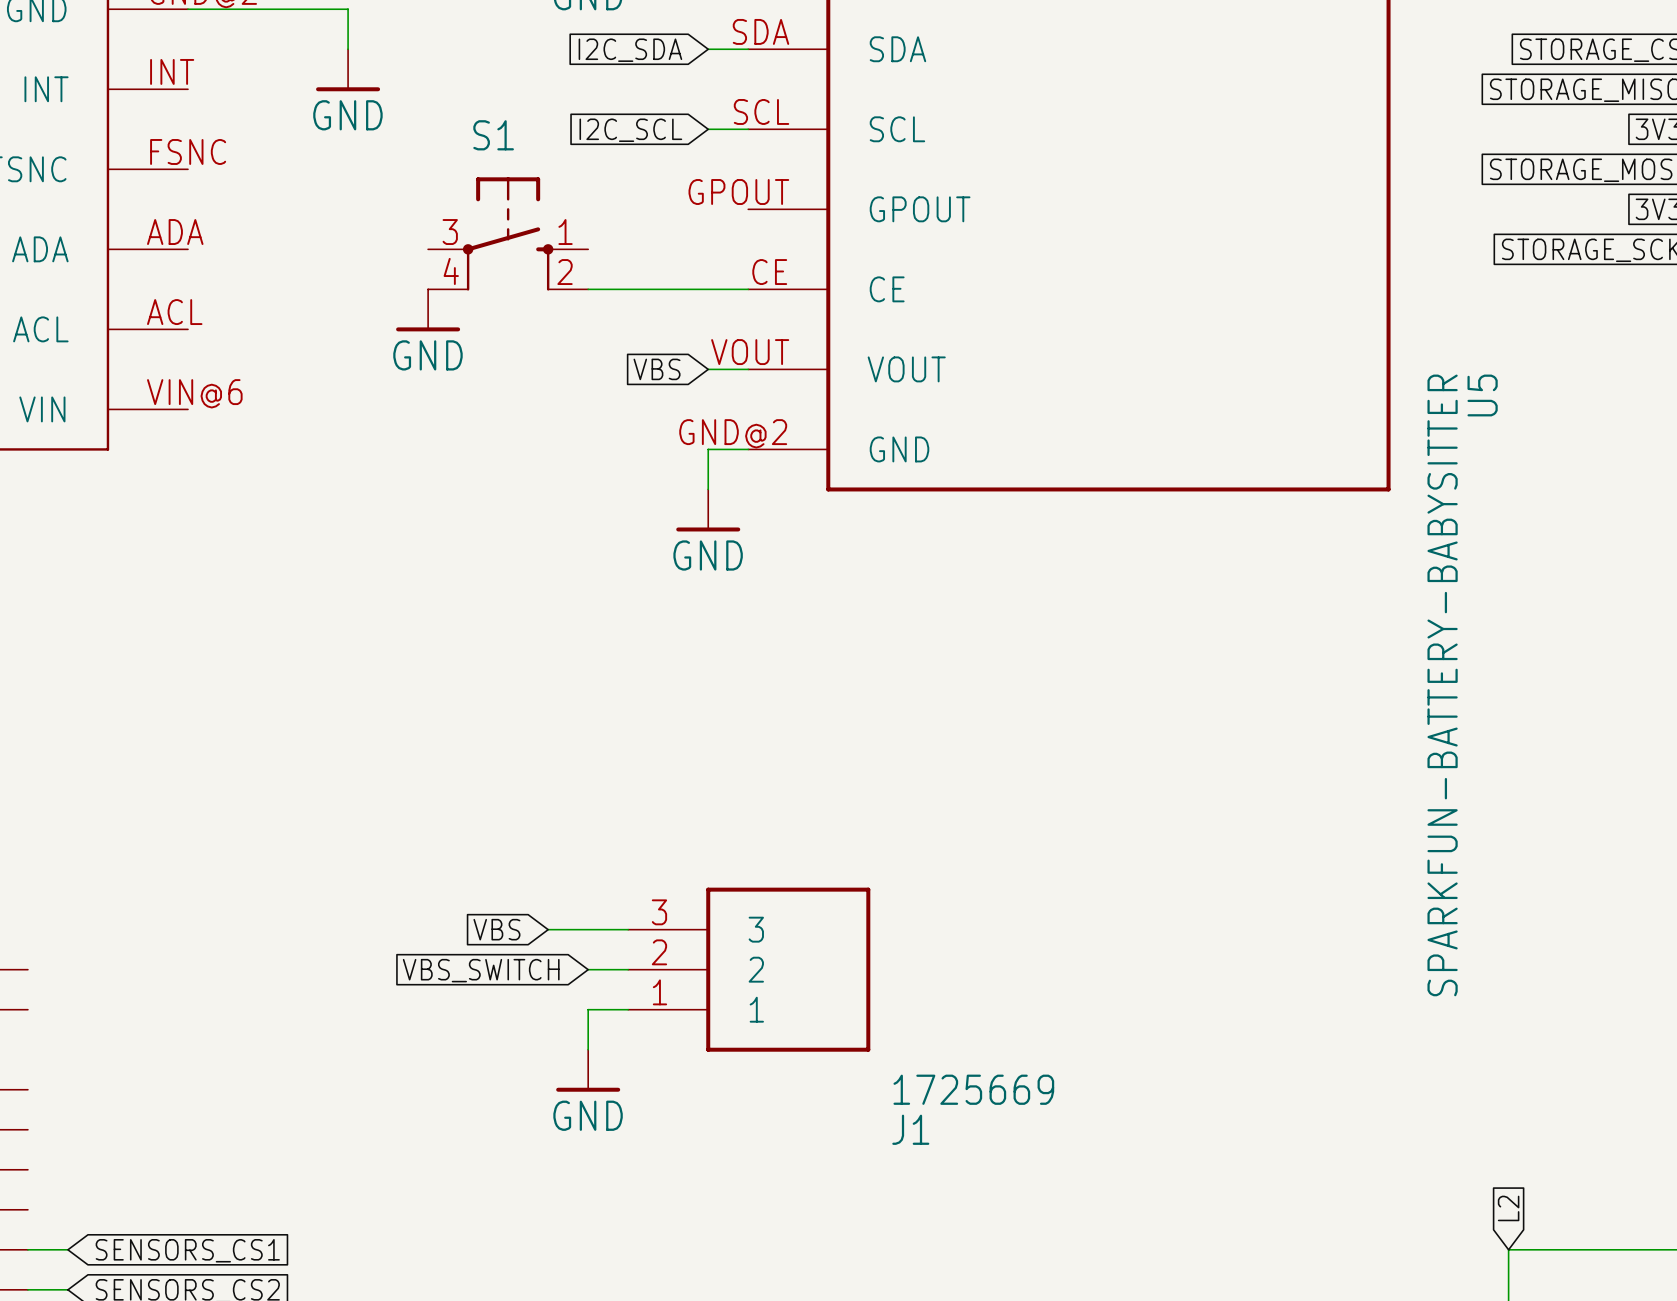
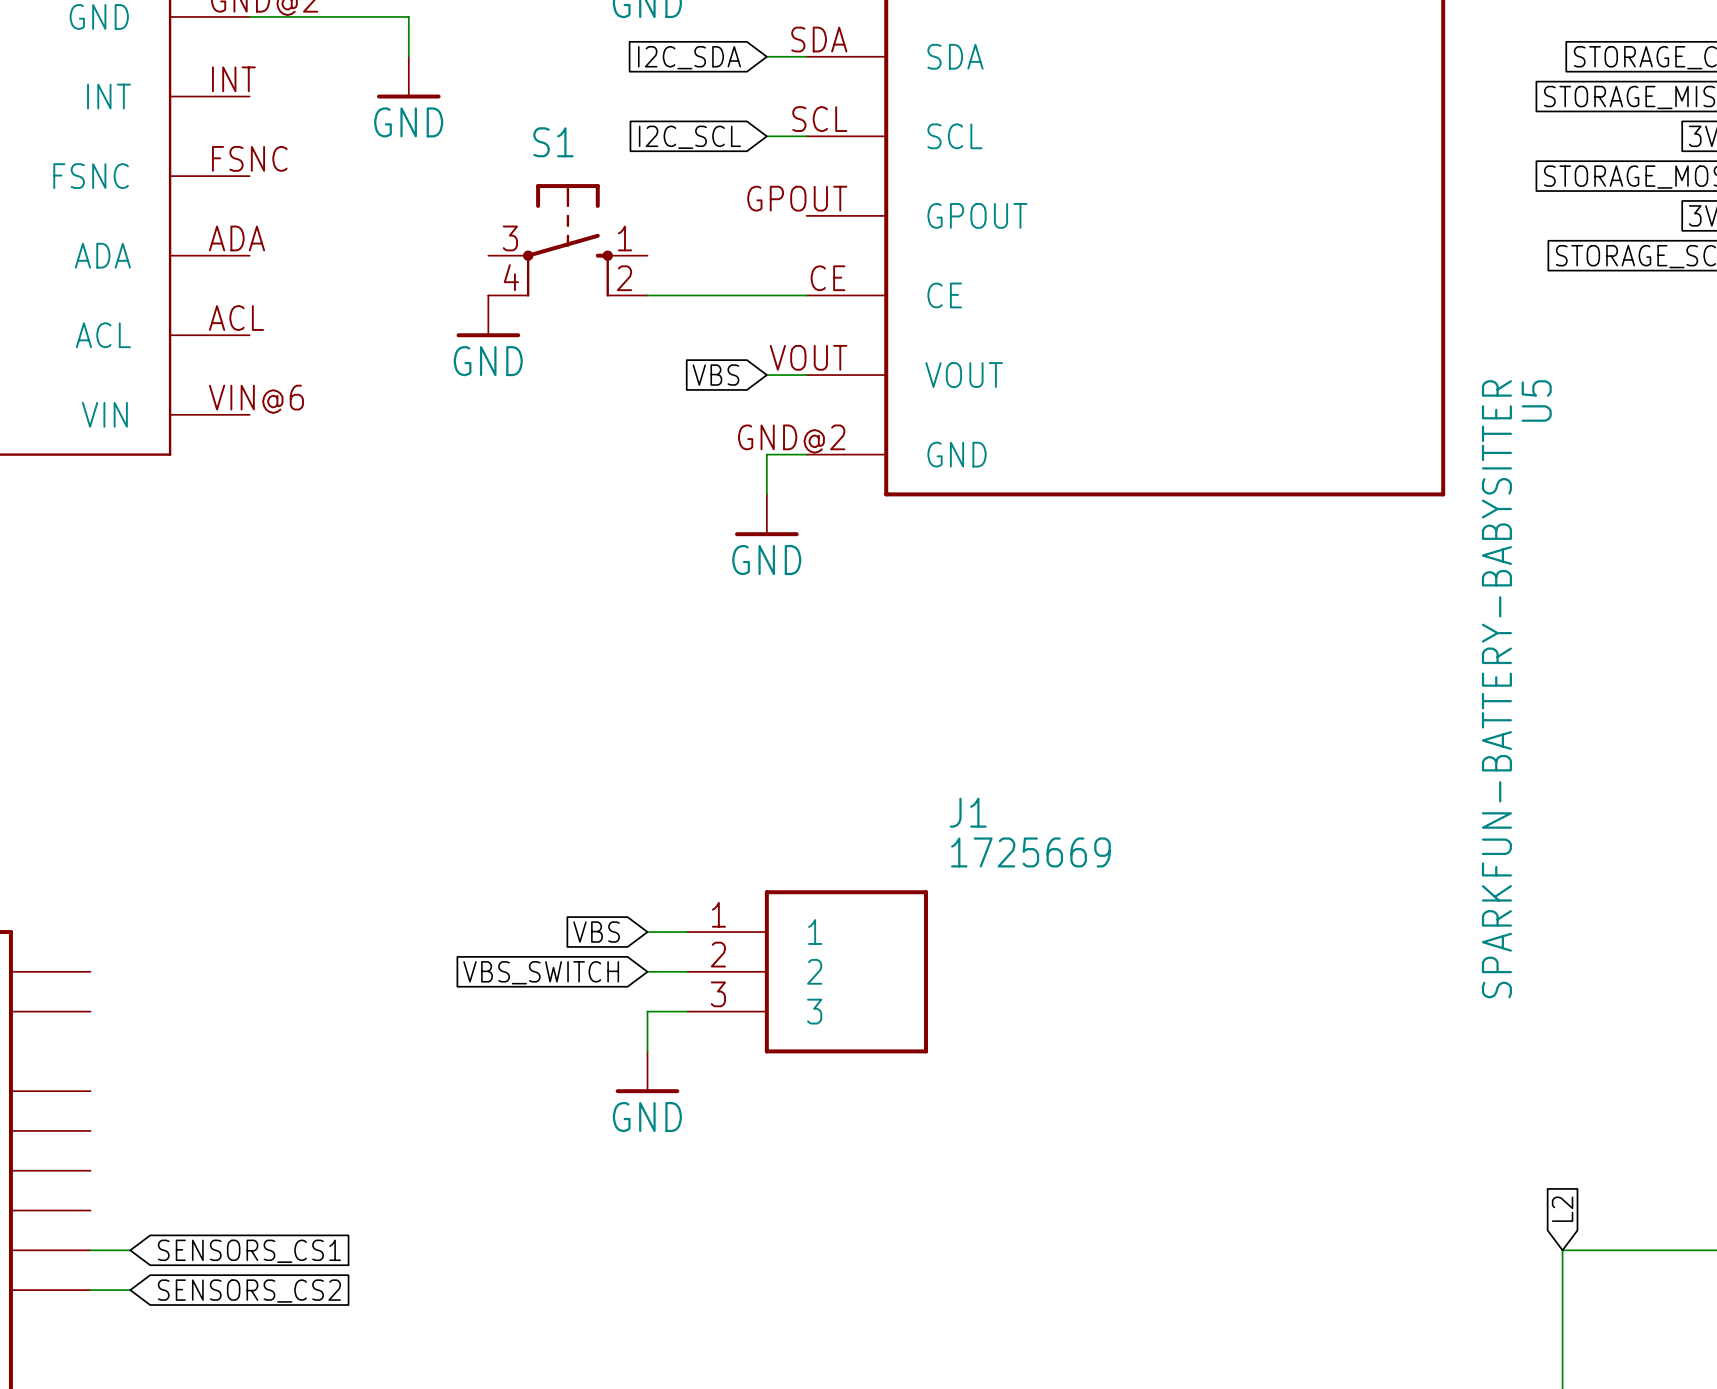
global label position: VBS (496, 929) -> VBS (596, 932)
wire: (548, 929) (588, 929) -> none
J1 flip: as is (788, 969) -> up-down (846, 971)

